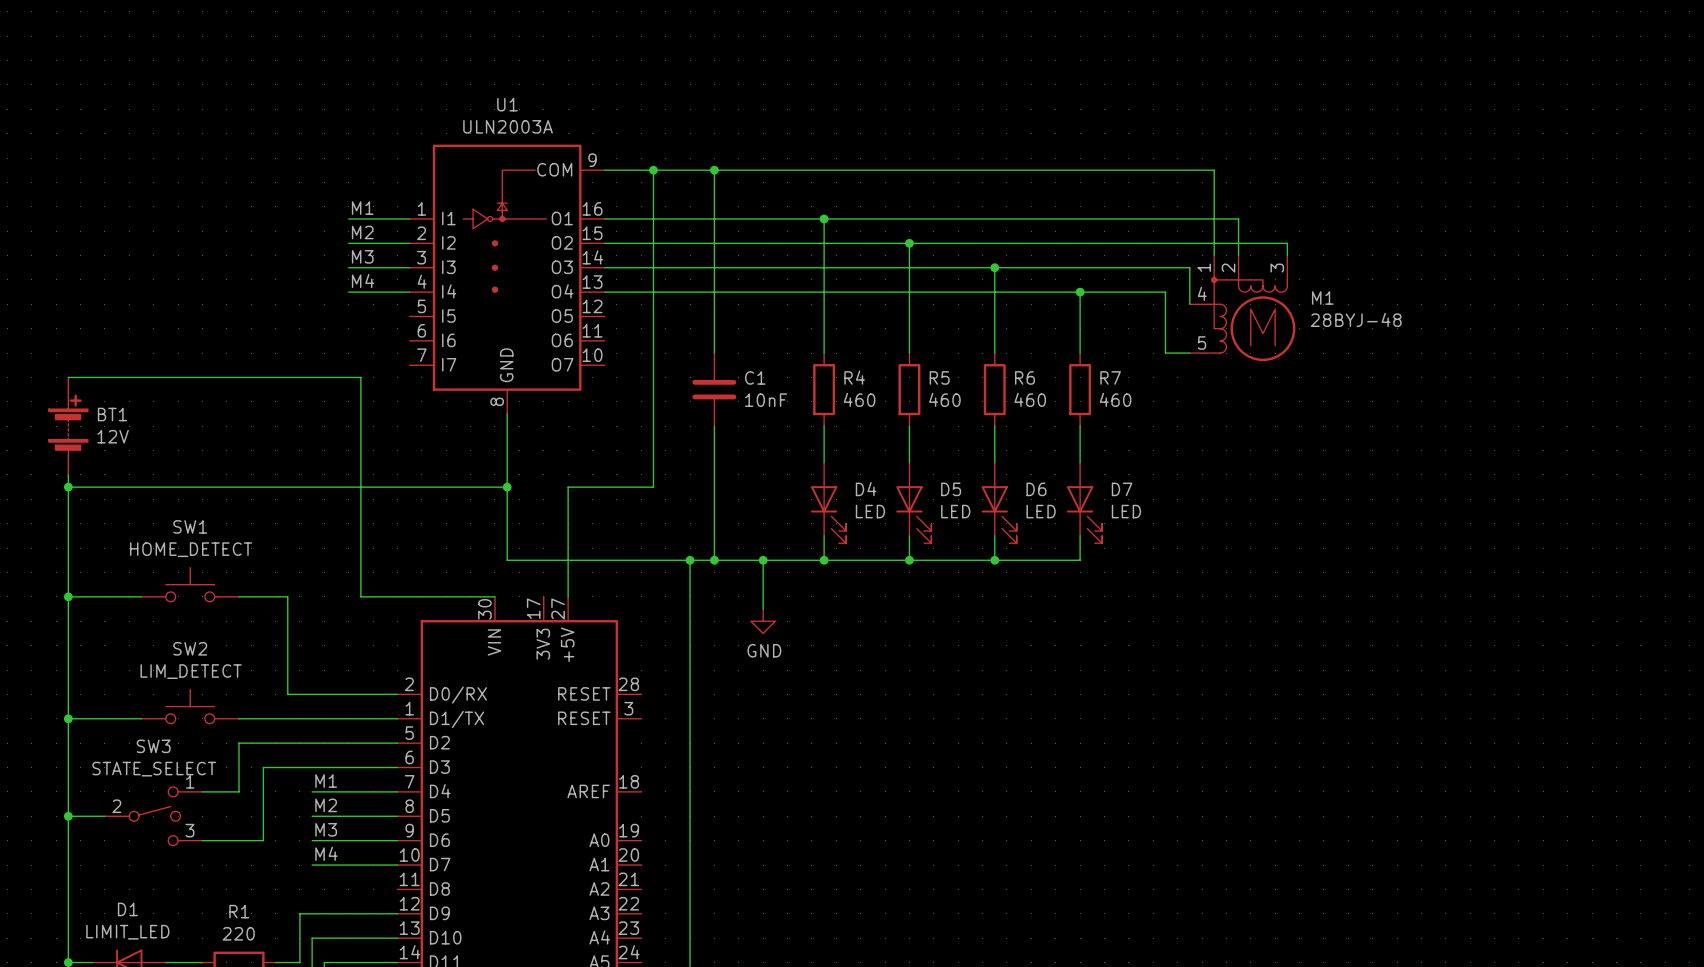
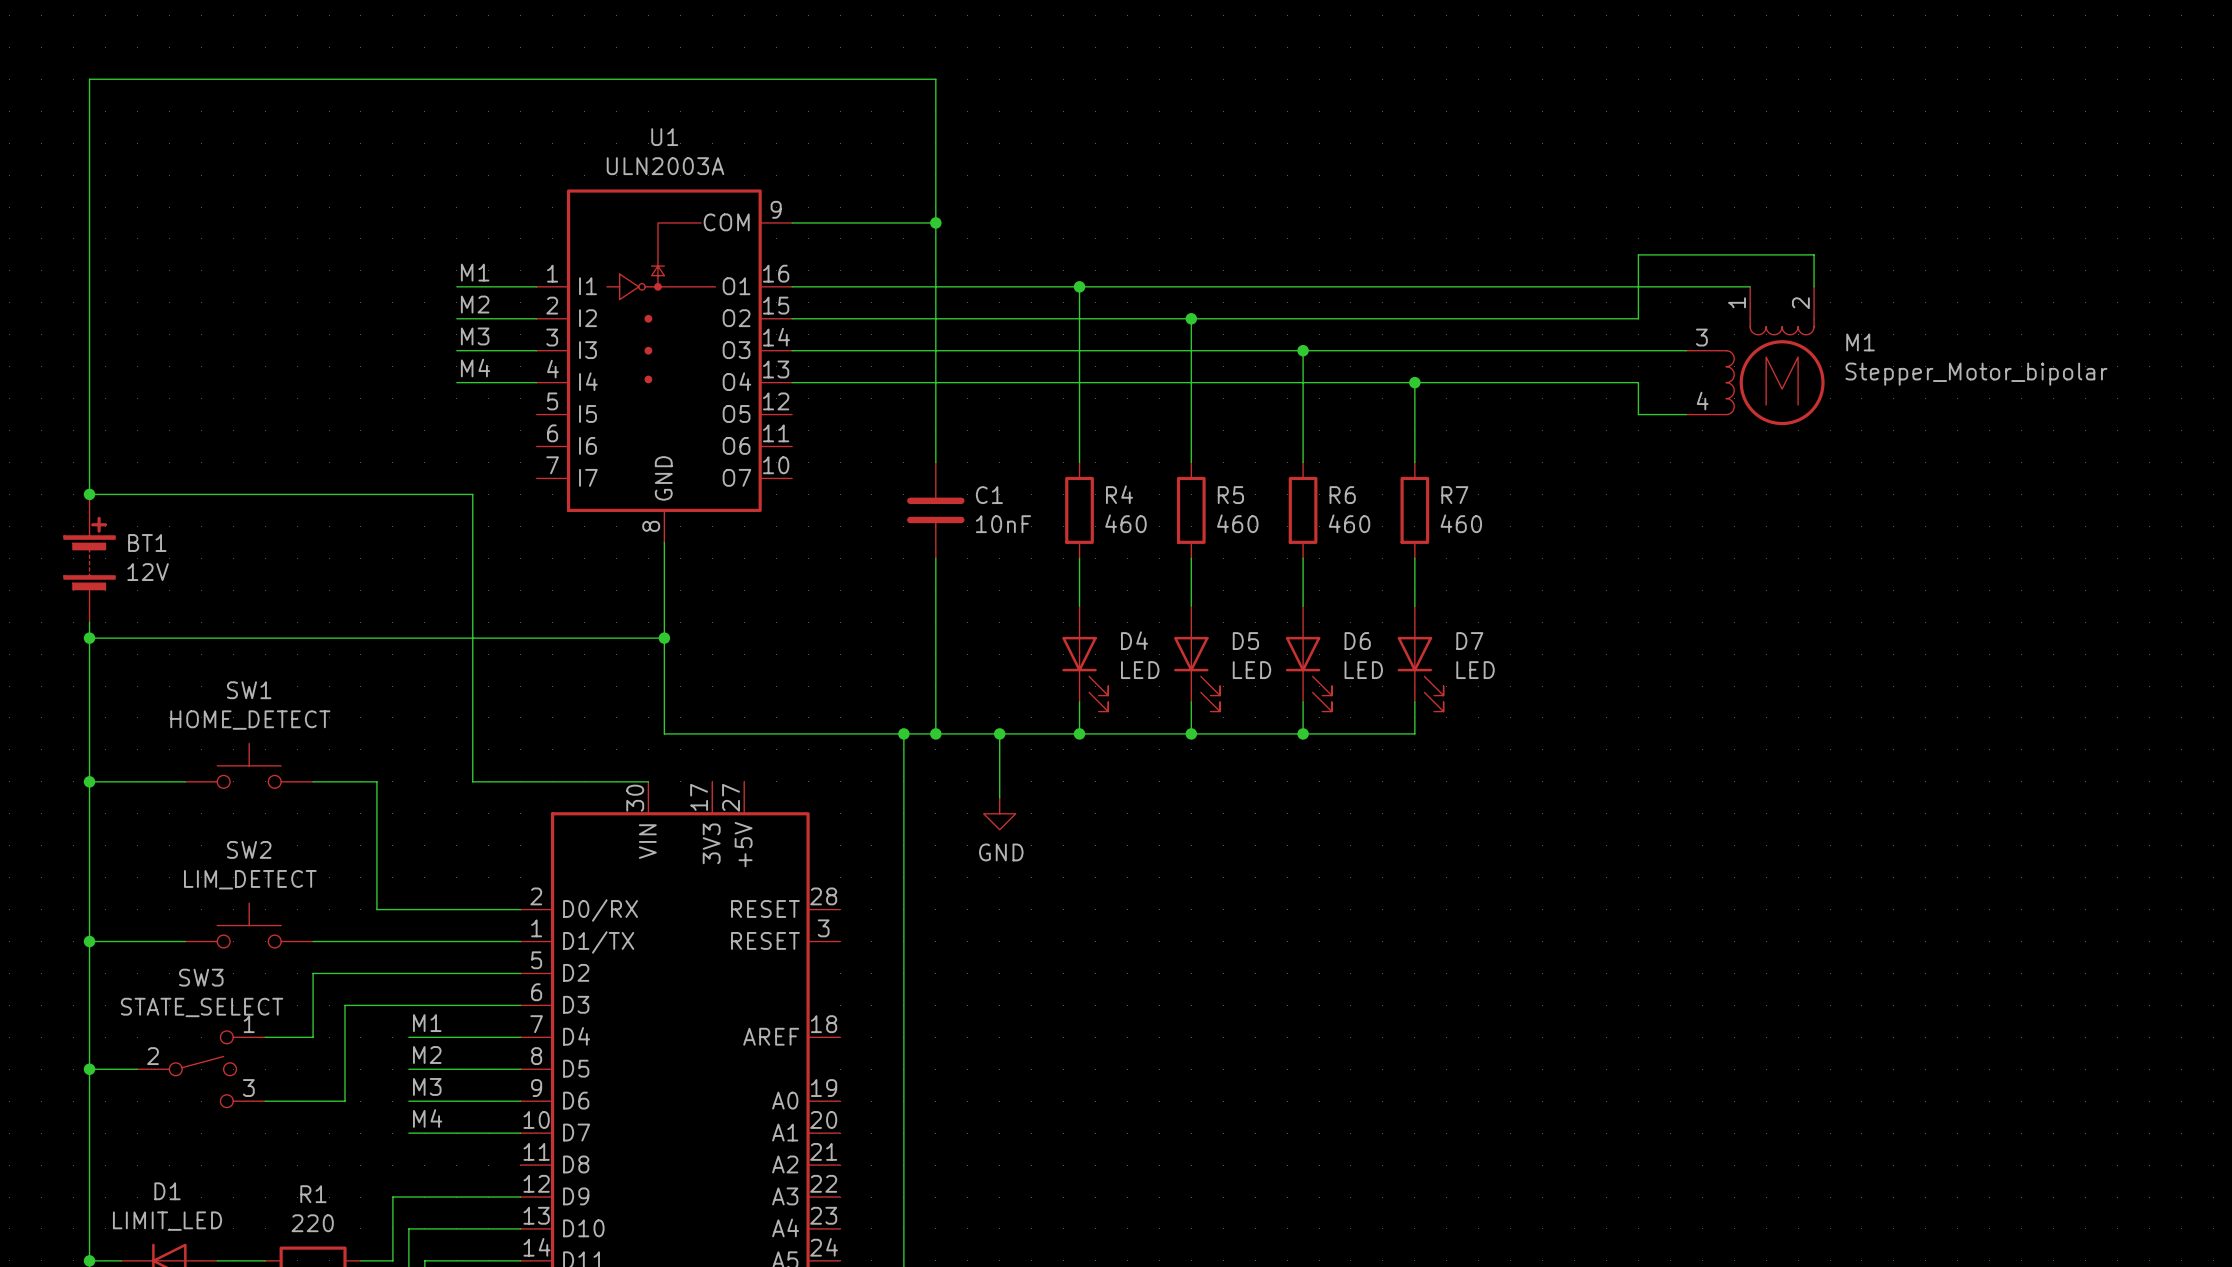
wire: (653, 170) (653, 487) (568, 487) (568, 596) -> none
junction: (653, 170) -> none
wire: (714, 170) (1214, 170) (1214, 255) -> (935, 222) (935, 79) (89, 79) (89, 494)
wire: (1238, 218) (1238, 255) -> (1622, 286) (1750, 286)
wire: (1250, 243) (1287, 243) (1287, 255) -> (1638, 318) (1638, 254) (1814, 254) (1814, 286)
M1 symbol: [1189, 255, 1296, 362] -> [1686, 286, 1825, 426]
wire: (1189, 267) (1189, 304) -> (1558, 350) (1686, 350)
wire: (1165, 292) (1165, 353) (1189, 353) -> (1526, 382) (1638, 382) (1638, 414) (1686, 414)
M1 value: 28BYJ-48 (1356, 319) -> Stepper_Motor_bipolar (1976, 374)
junction: none -> (89, 494)

